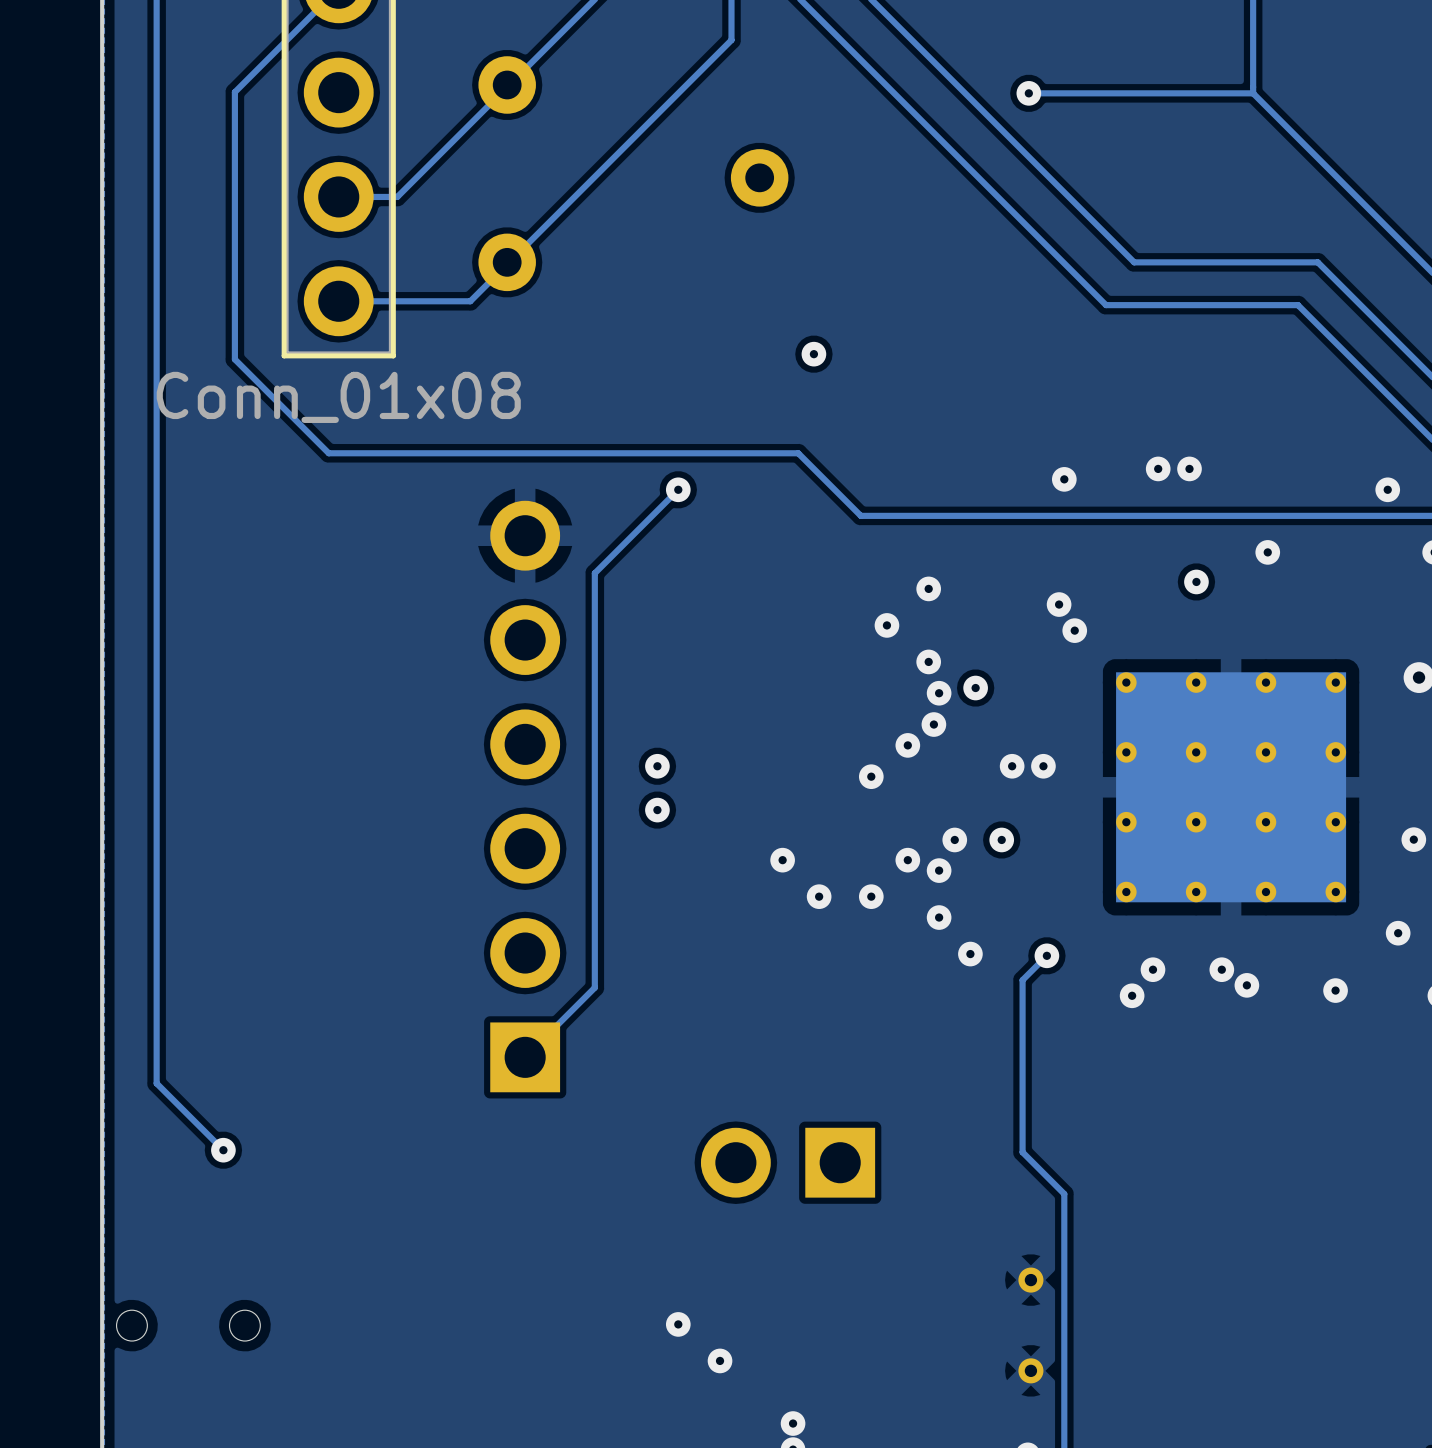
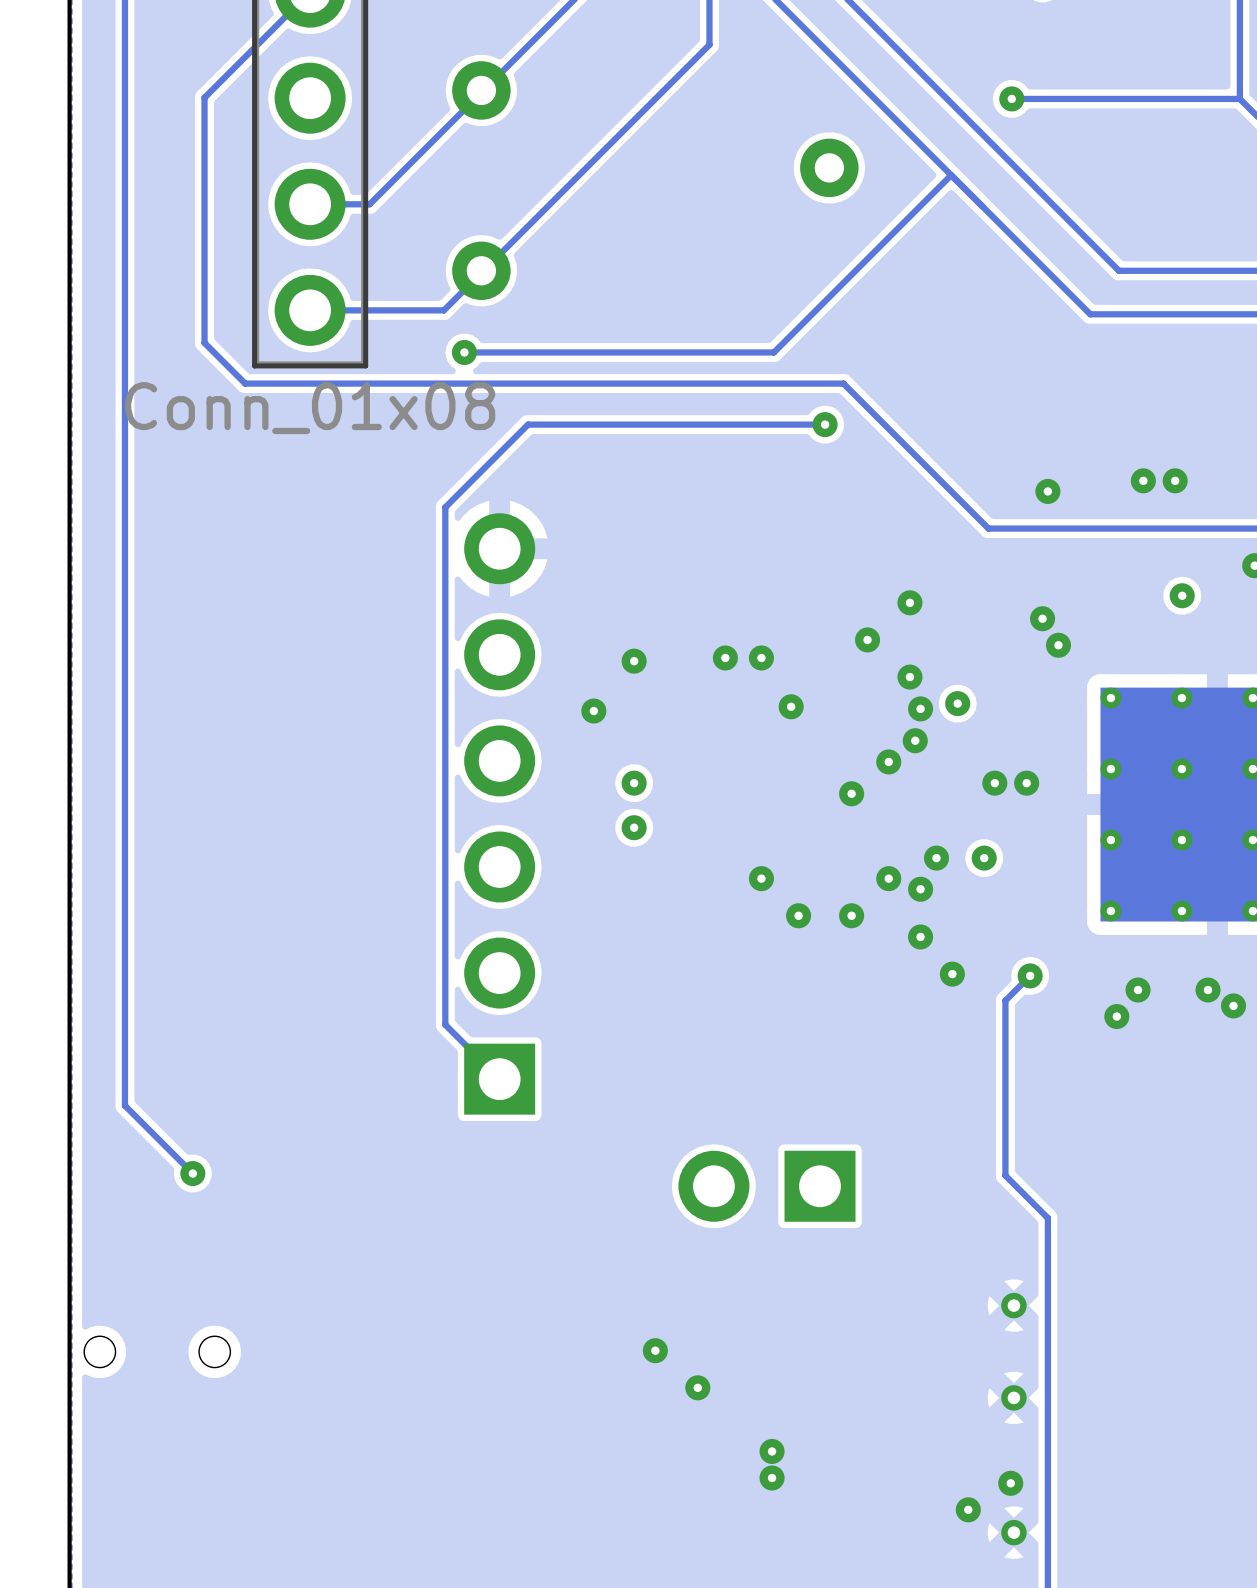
track: none -> (951, 175) (773, 352) (464, 352)
part position: (759, 177) -> (829, 167)
track: (234, 333) (234, 359) (328, 453) (798, 453) (860, 515) (1005, 515) -> (204, 342) (245, 383) (843, 383) (988, 528)
via: none -> (464, 352)
via position: (813, 354) -> (825, 424)
track: (678, 489) (594, 573) (594, 987) (525, 1057) -> (825, 424) (528, 424) (445, 507) (445, 1024) (499, 1079)
via: (678, 489) -> none
via: none -> (725, 657)
via: none -> (761, 657)
via: none -> (634, 661)
via: none -> (791, 706)
via: none -> (593, 711)

